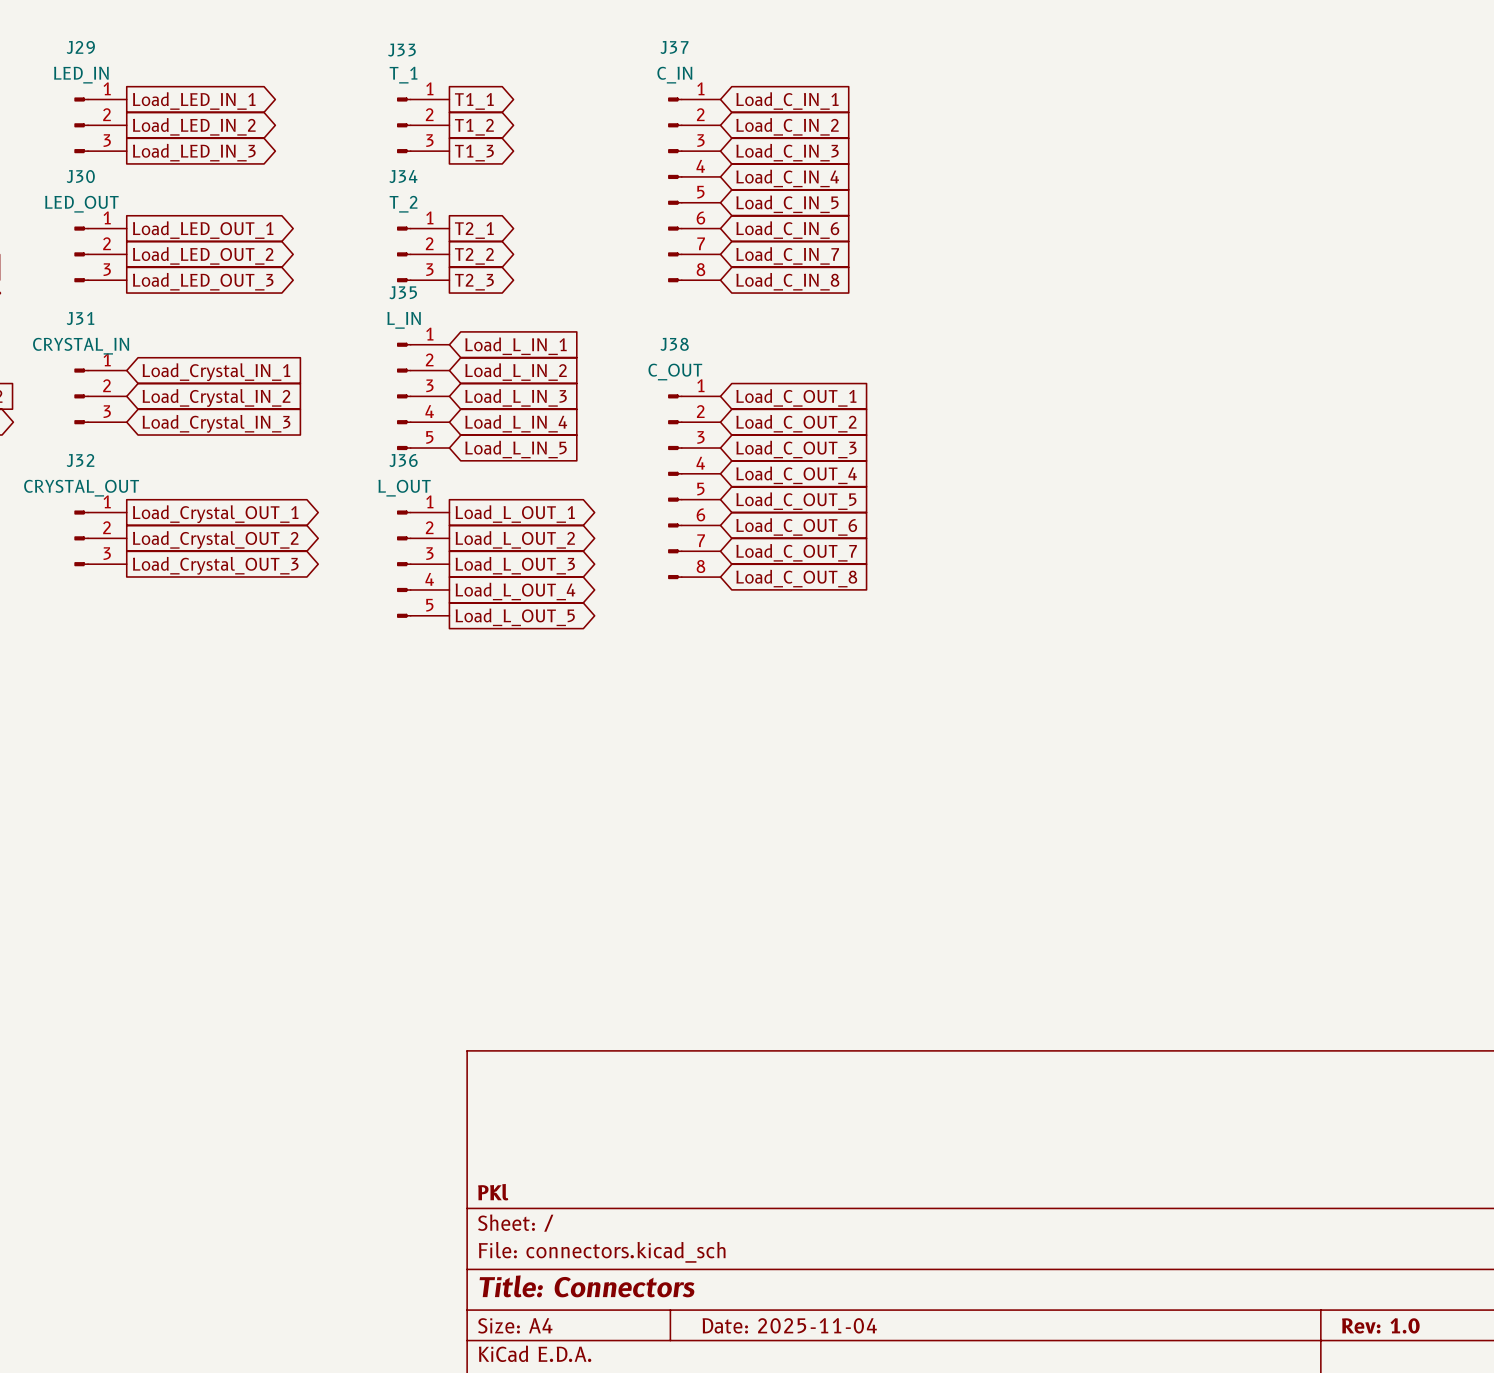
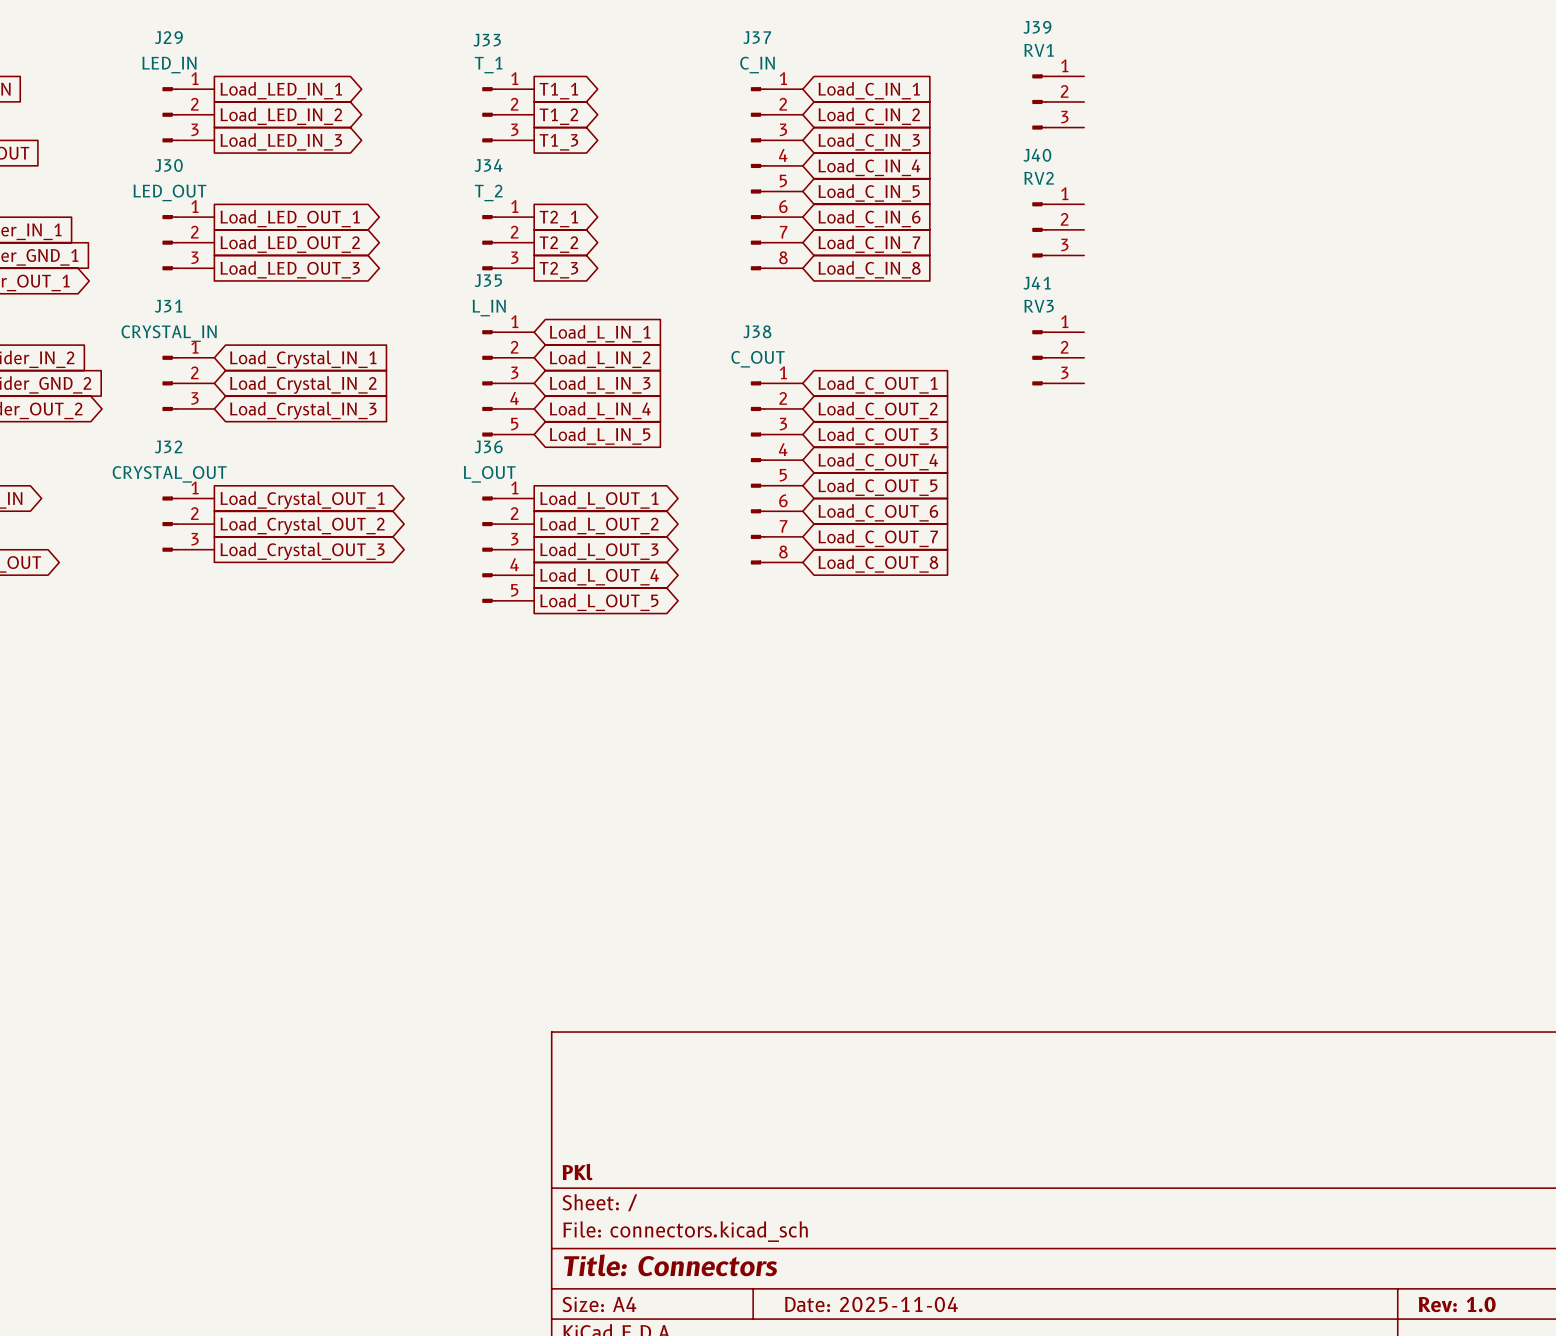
J39: none -> RV1 (1058, 101)
J40: none -> RV2 (1058, 229)
J41: none -> RV3 (1058, 357)

